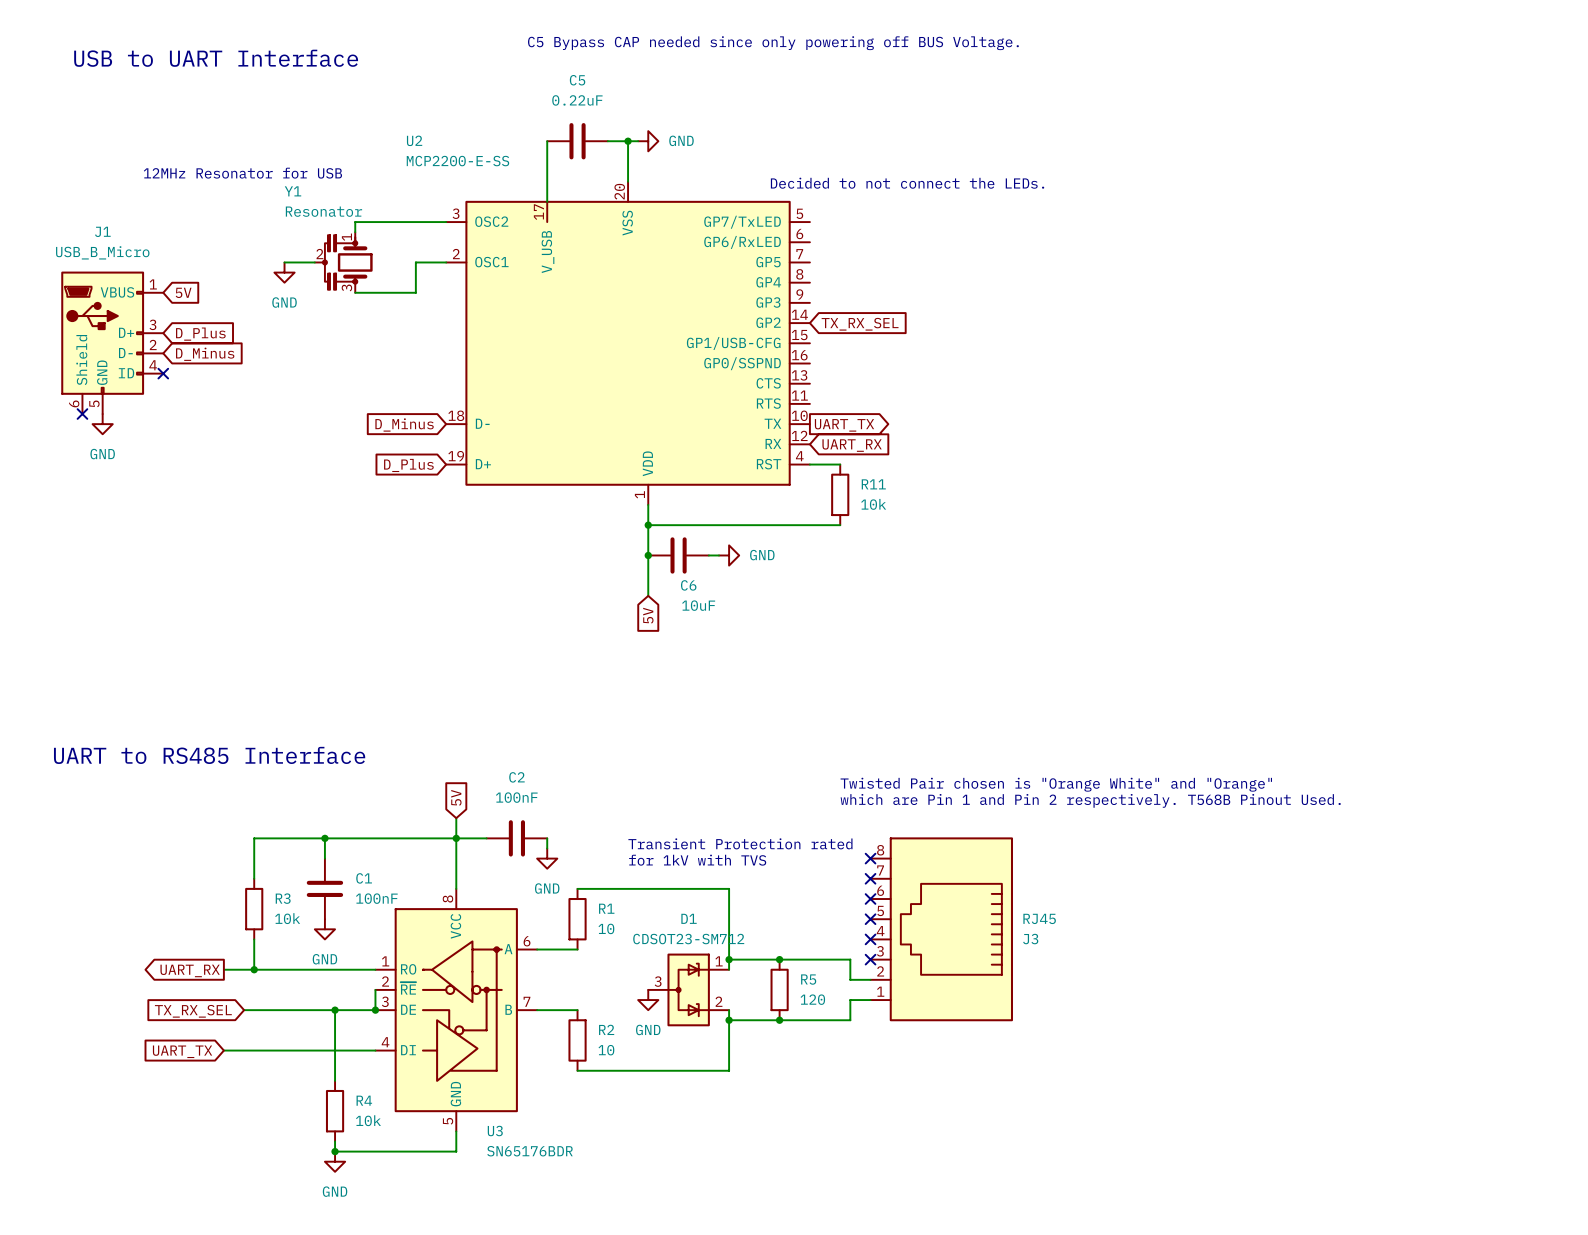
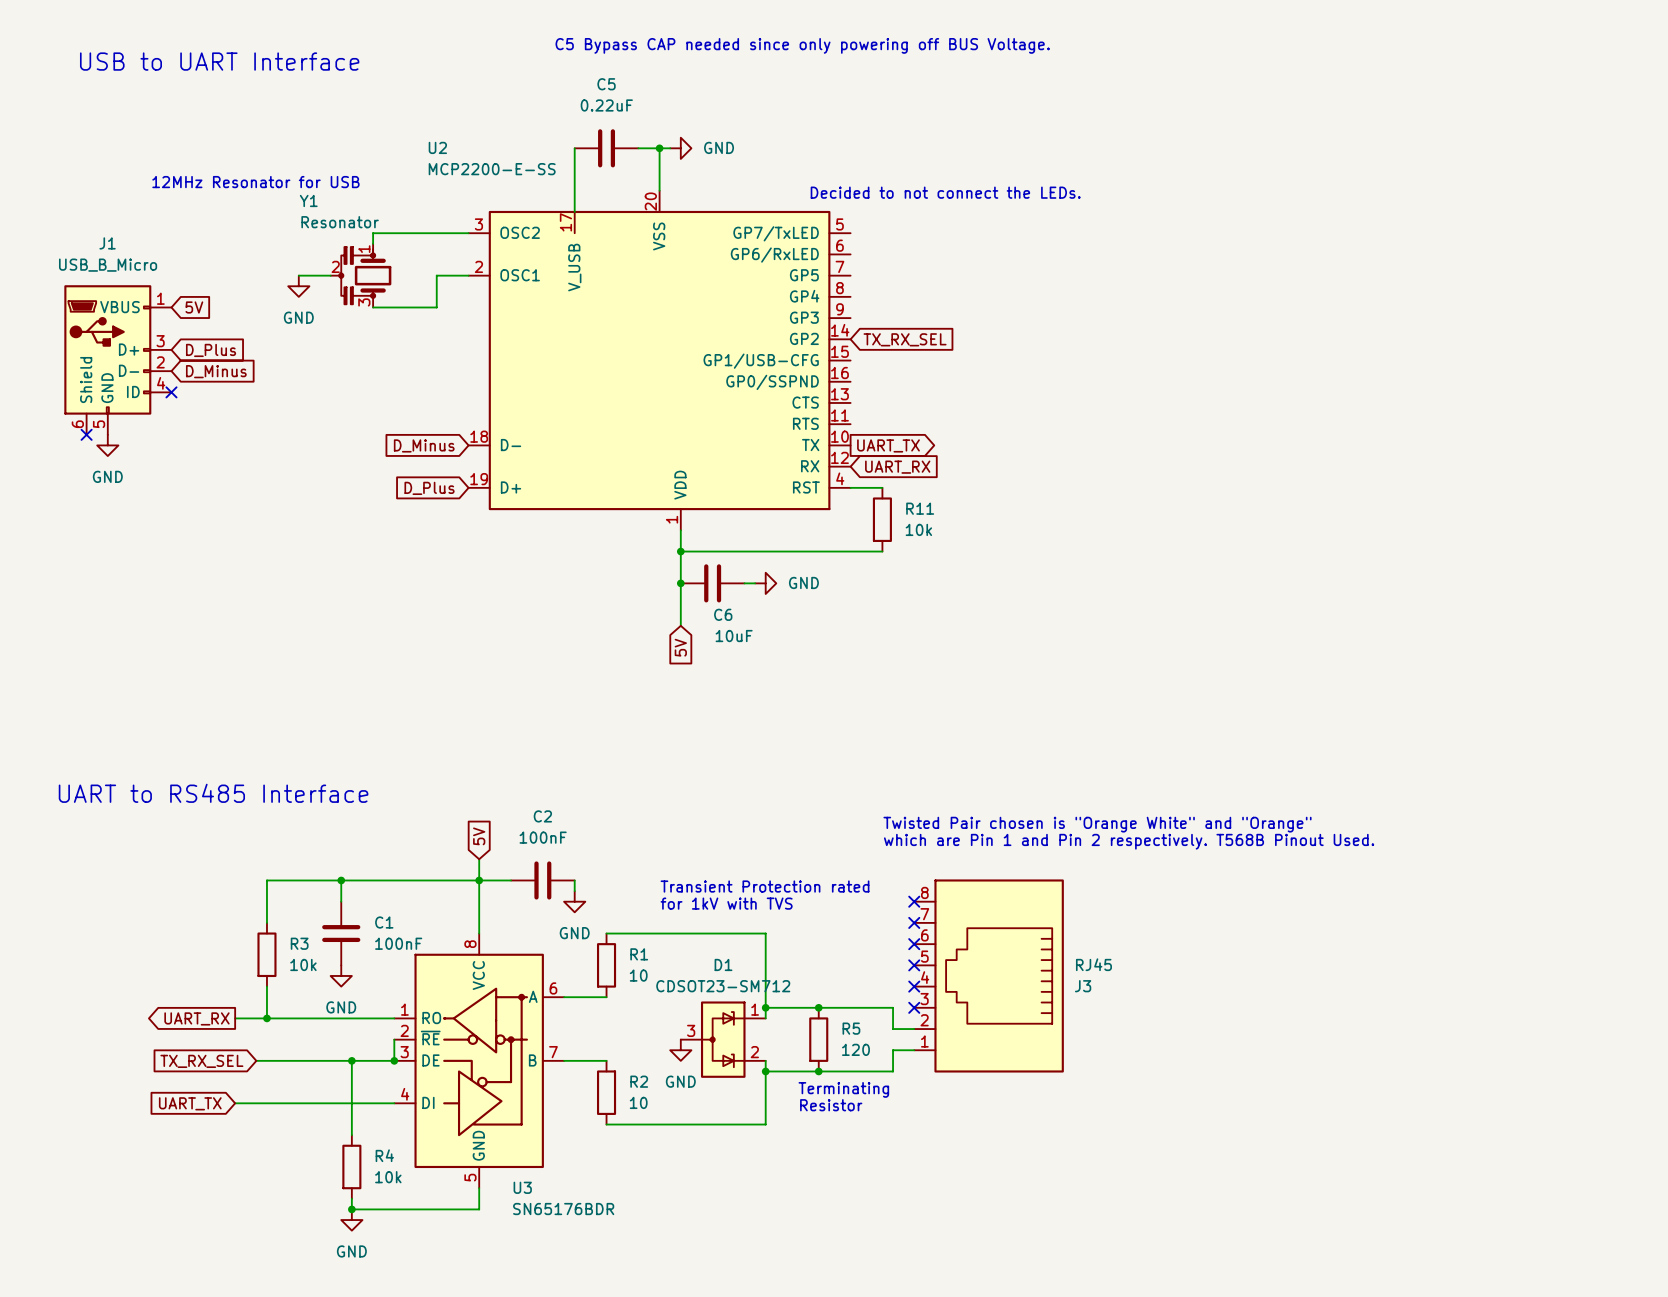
text: none -> Terminating (843, 1089)
text: none -> Resistor (831, 1105)

